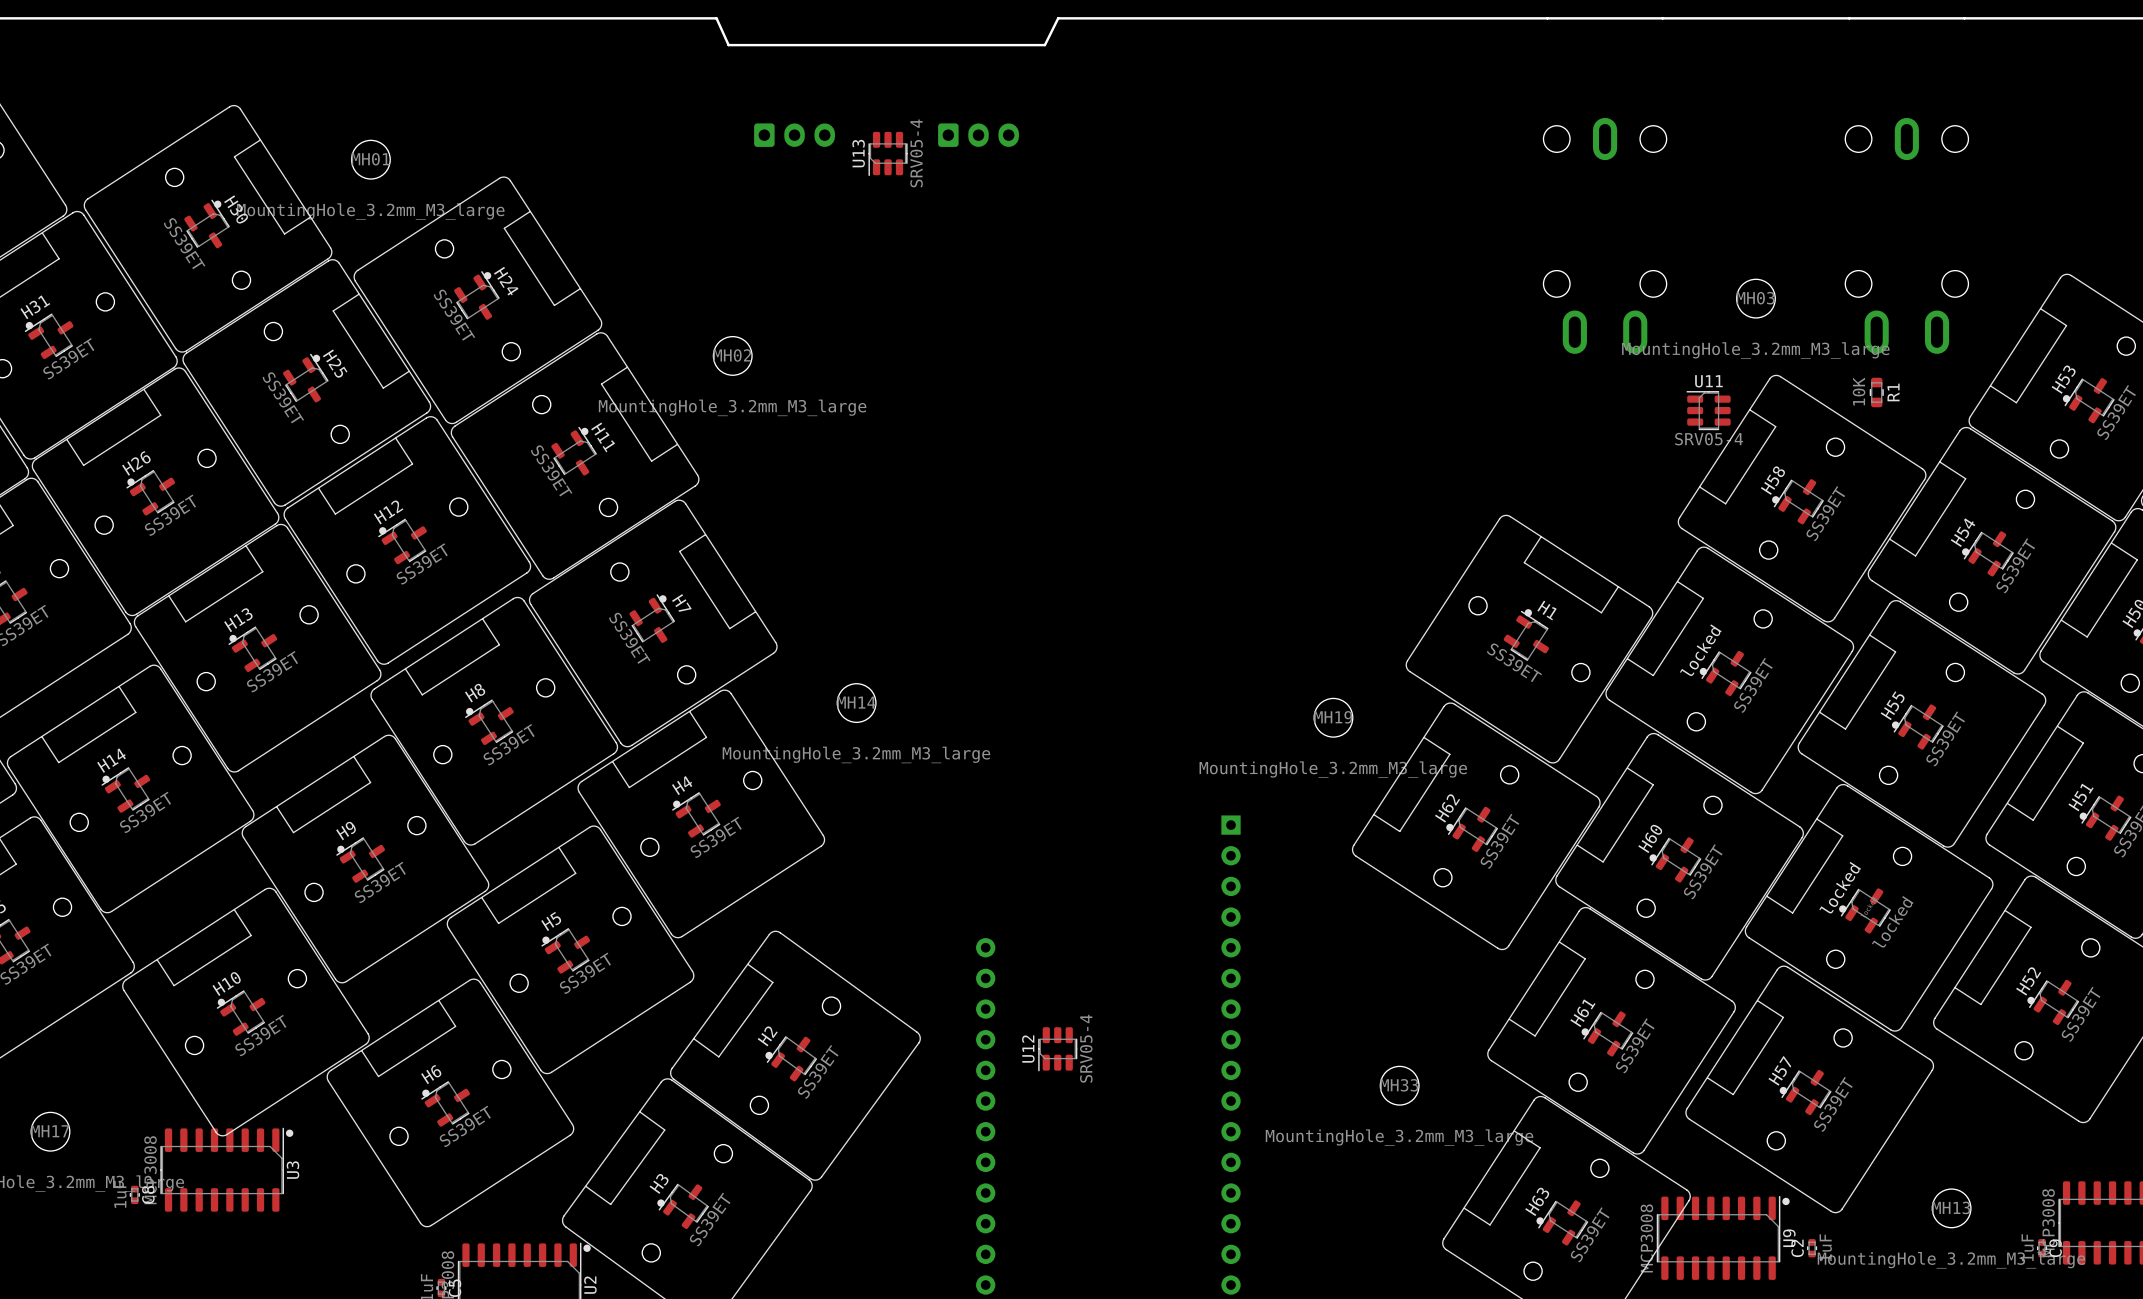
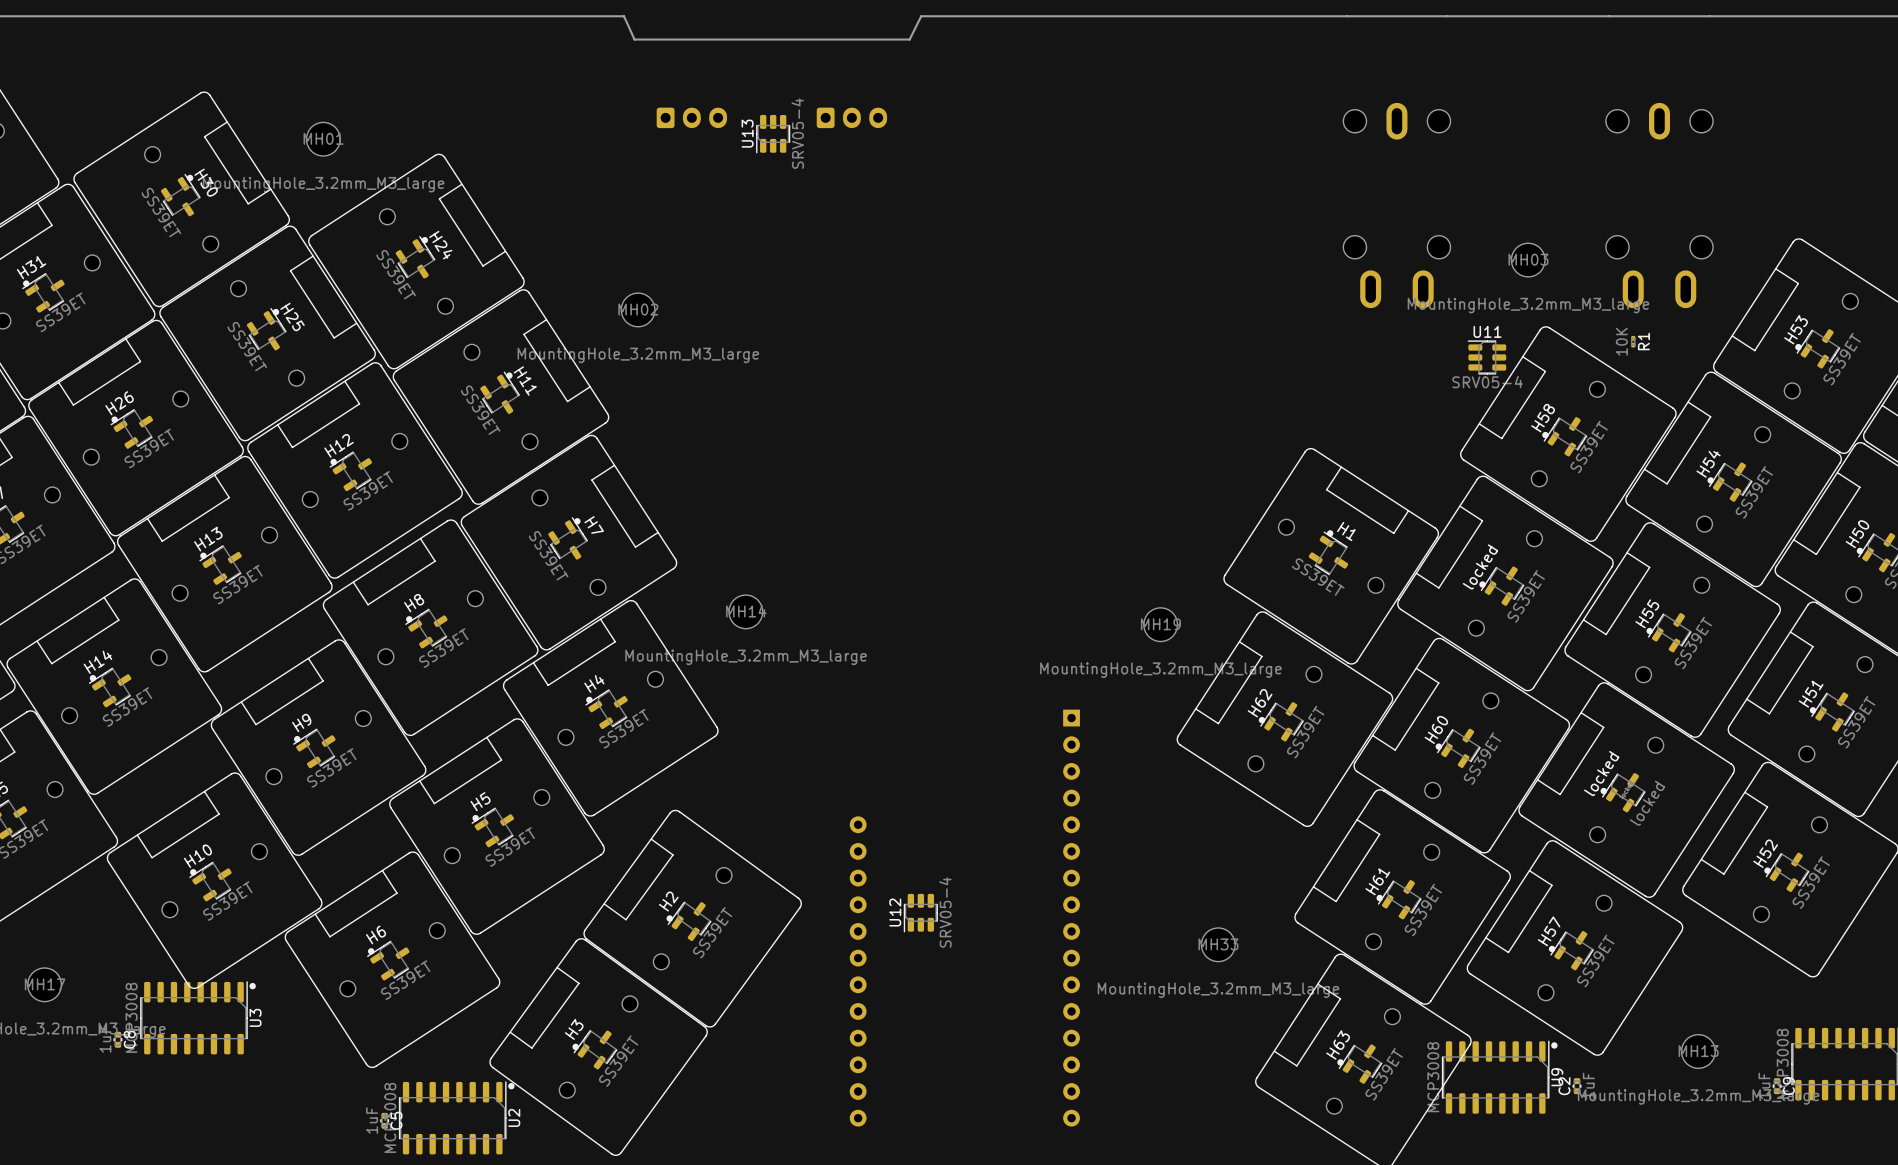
R1 footprint: [1869, 377, 1884, 408] -> [1631, 335, 1636, 348]

